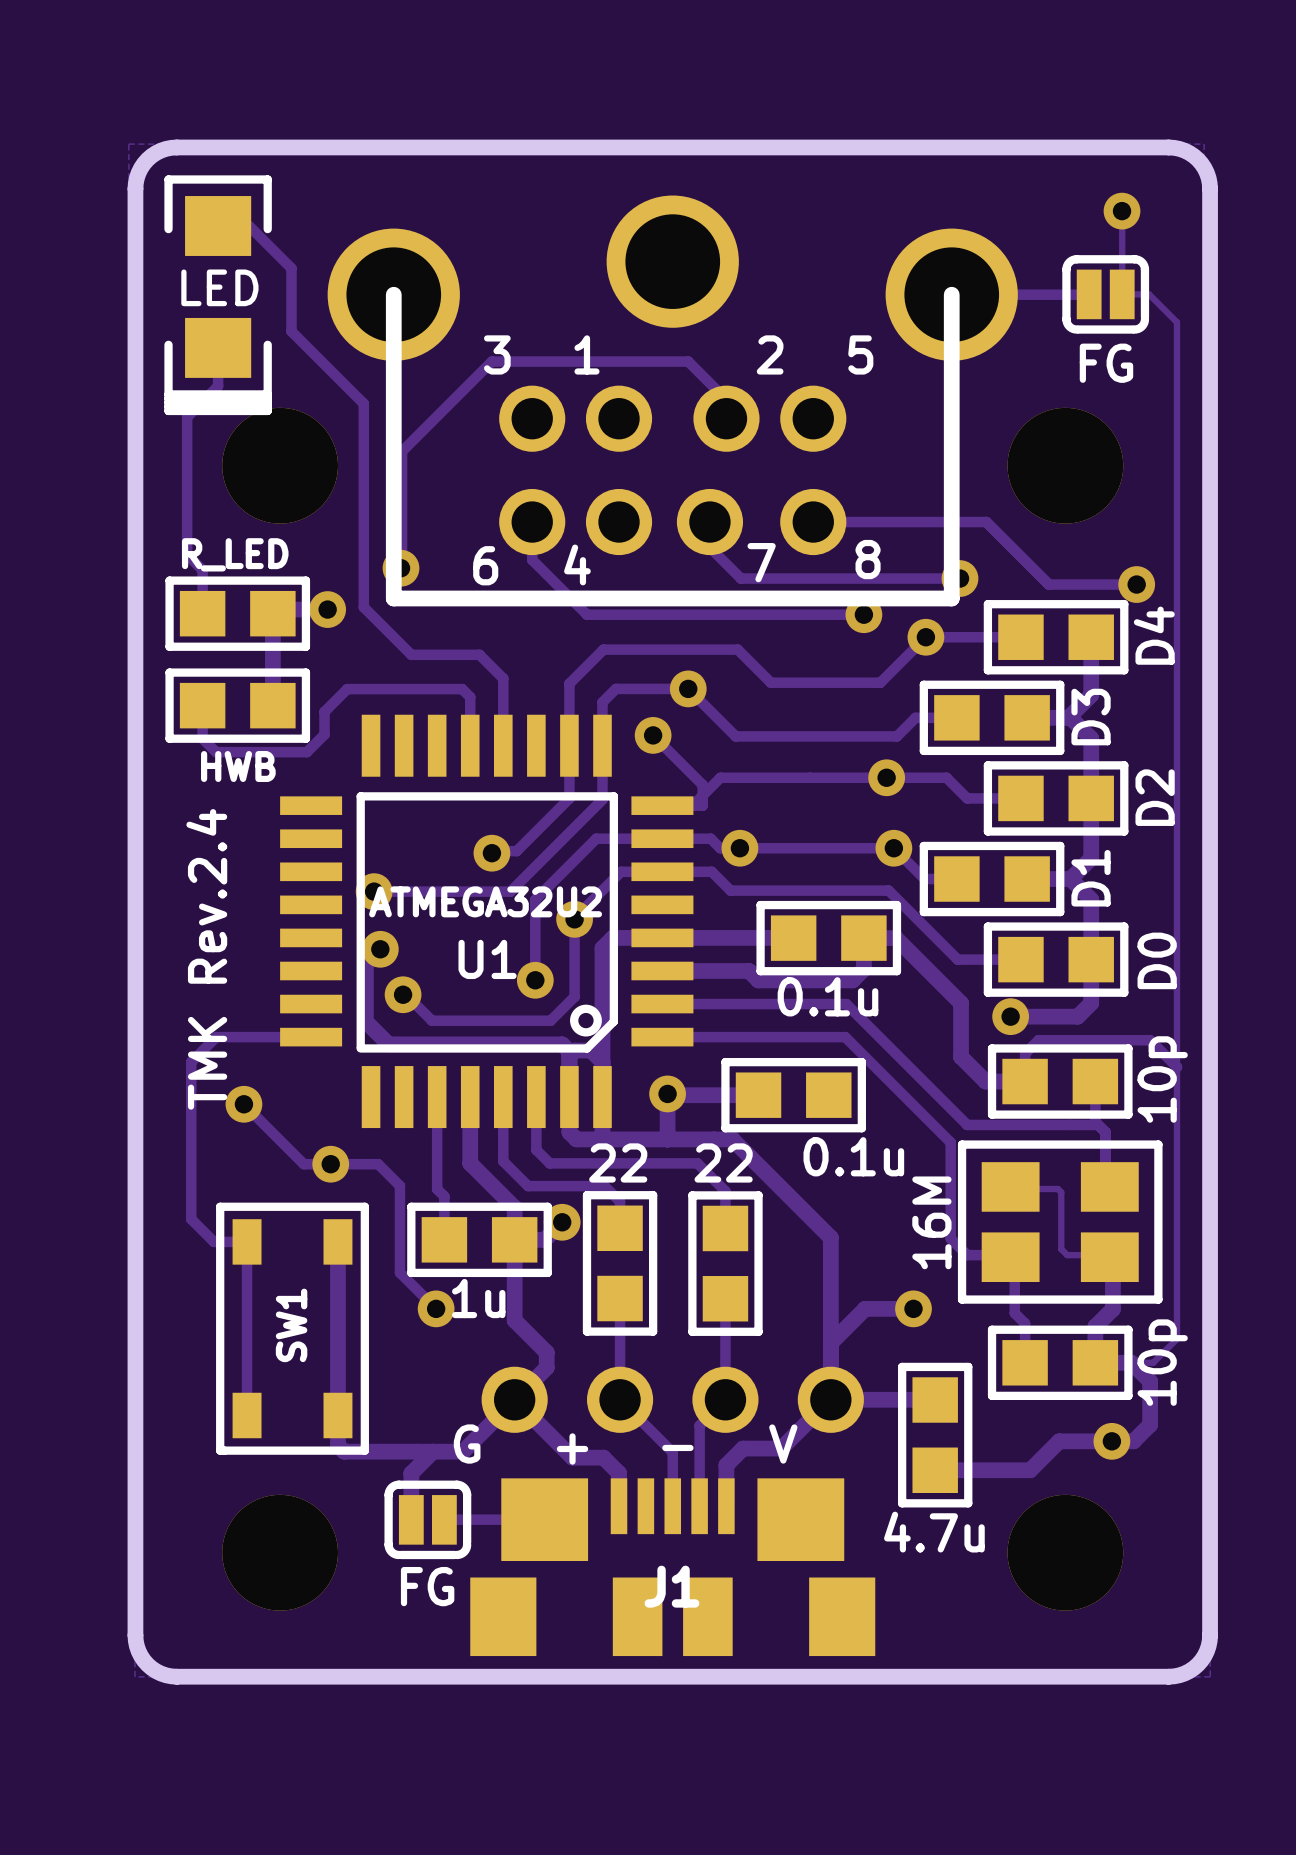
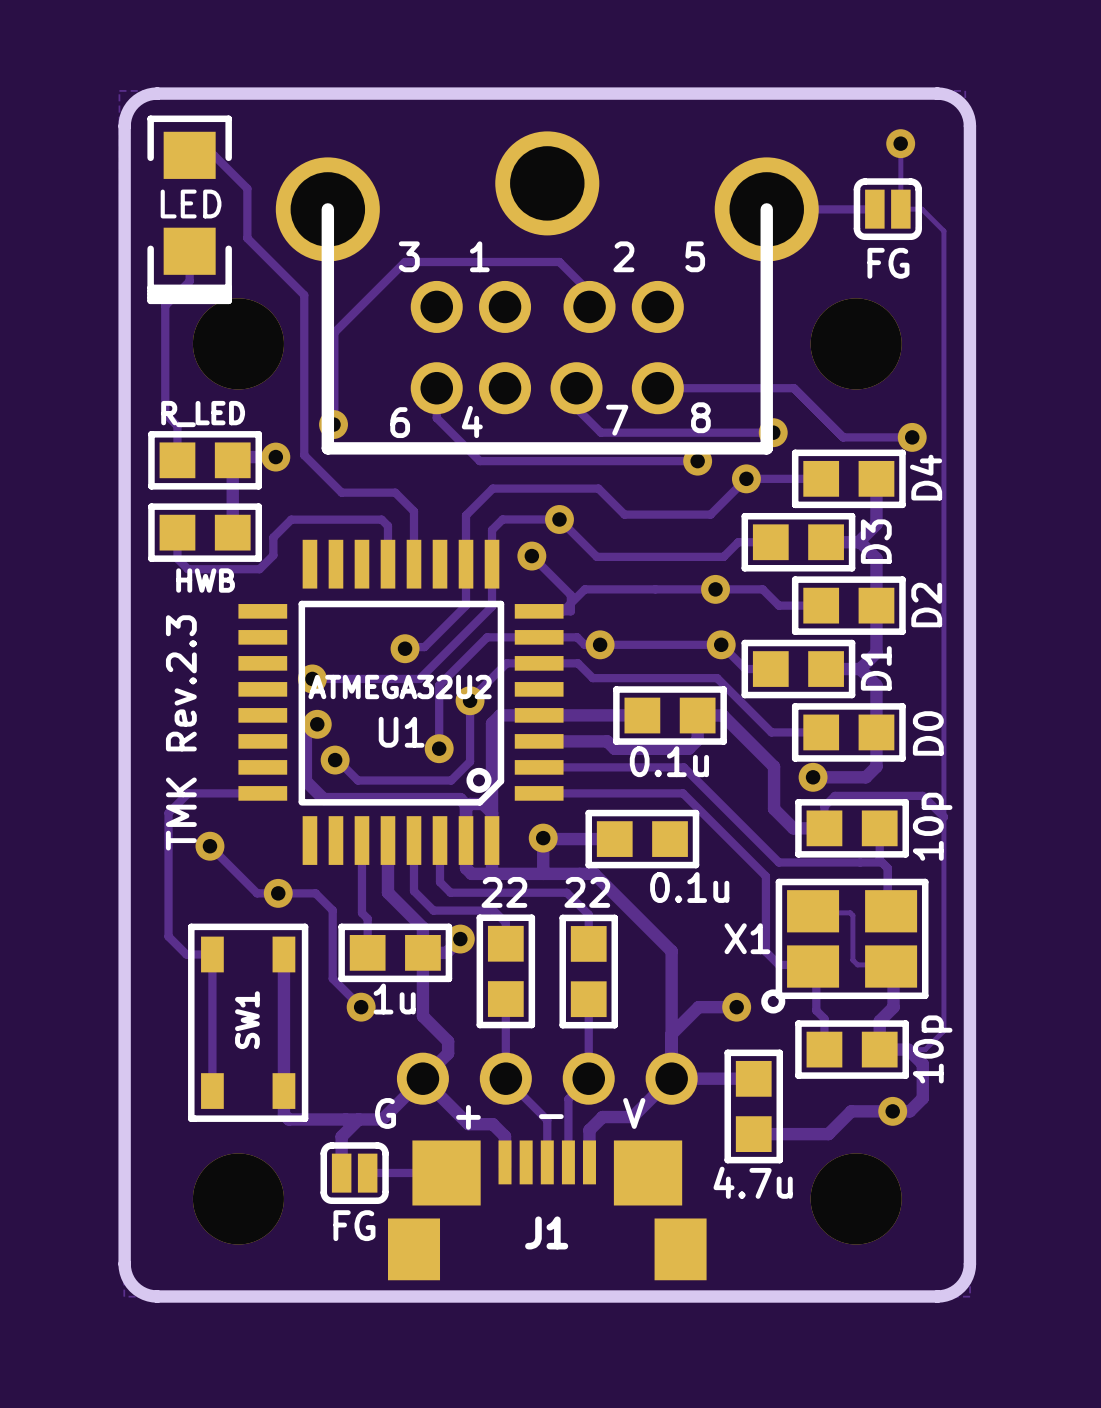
text: TMK Rev.2.4 (206, 959) -> TMK Rev.2.3 (181, 732)
part: 16M (1060, 1222) -> none
X1: none -> (844, 946)
J1 footprint: [470, 1478, 876, 1657] -> [387, 1140, 707, 1281]

